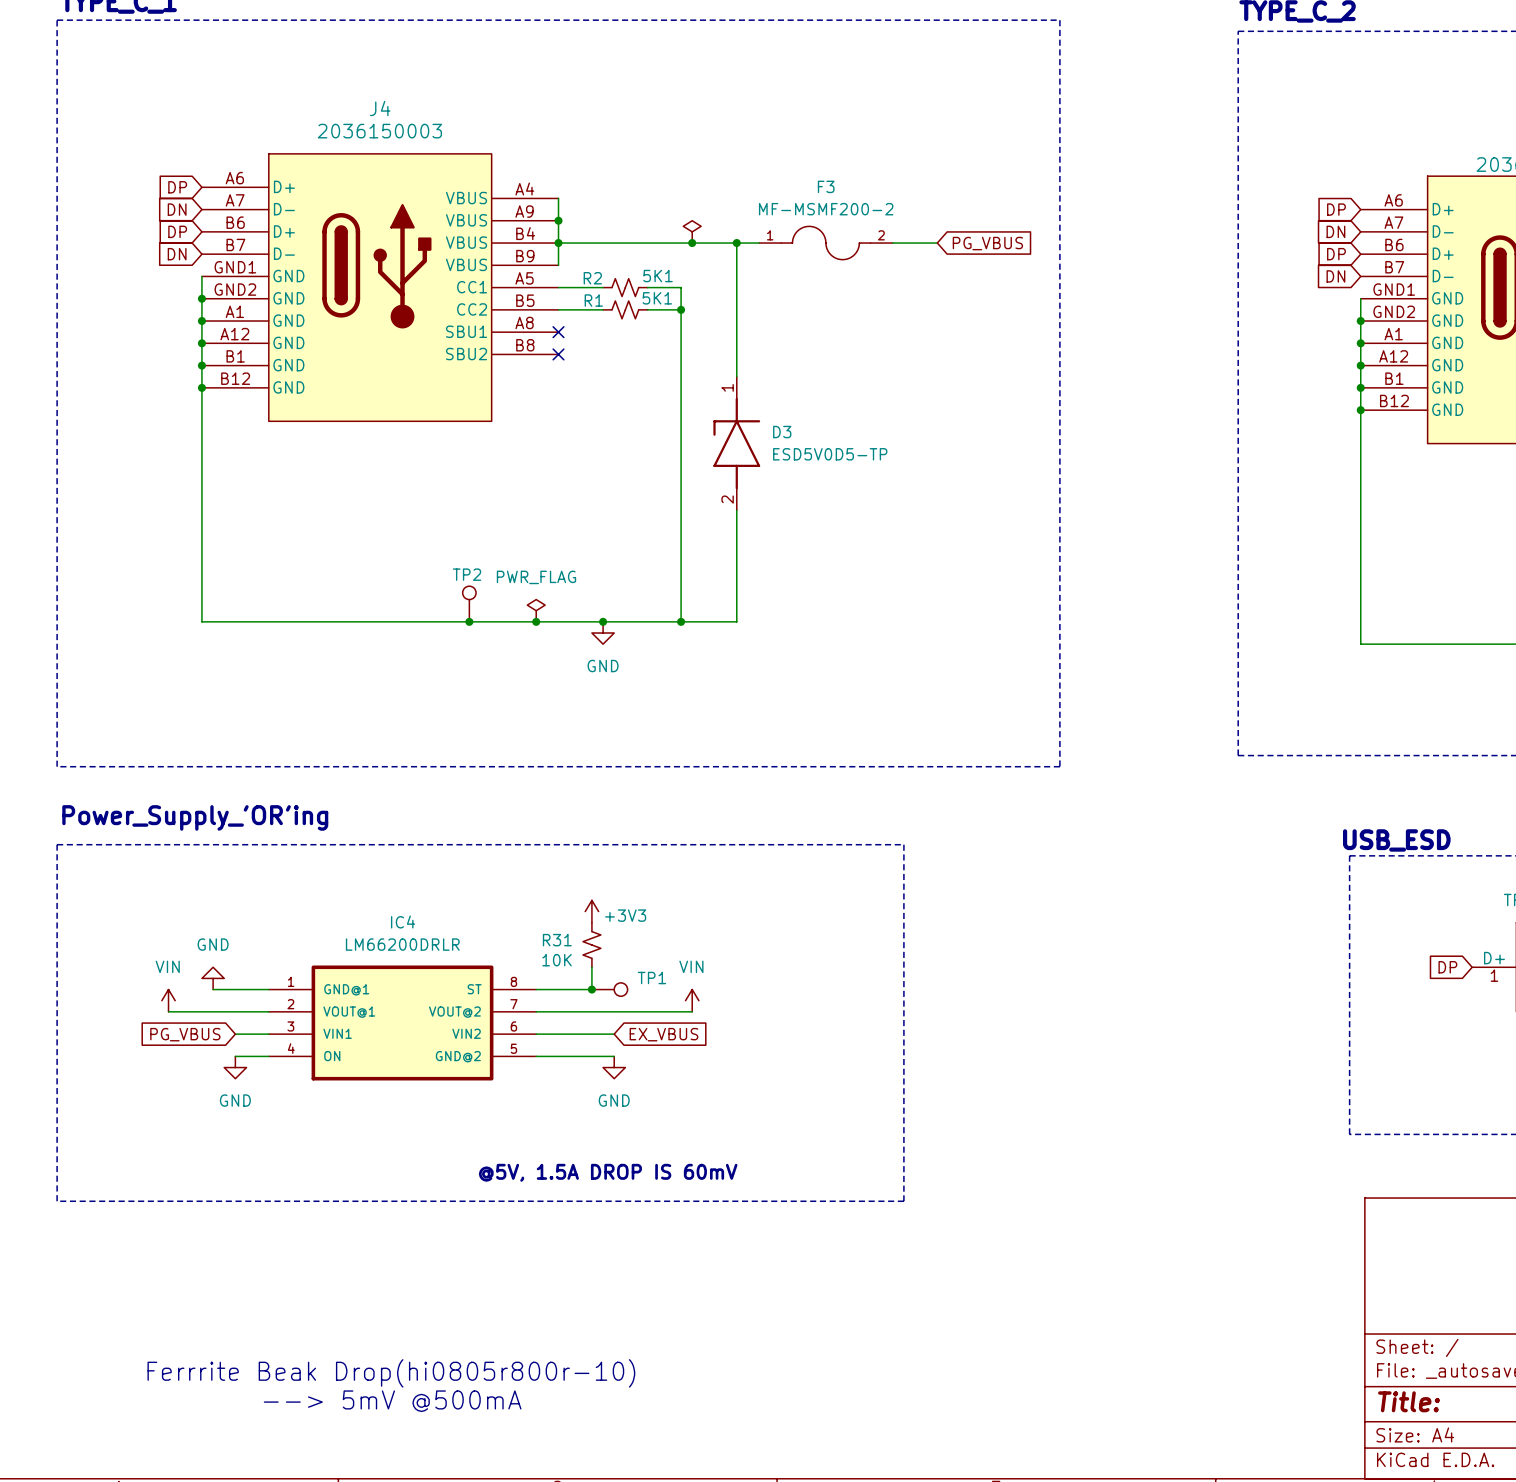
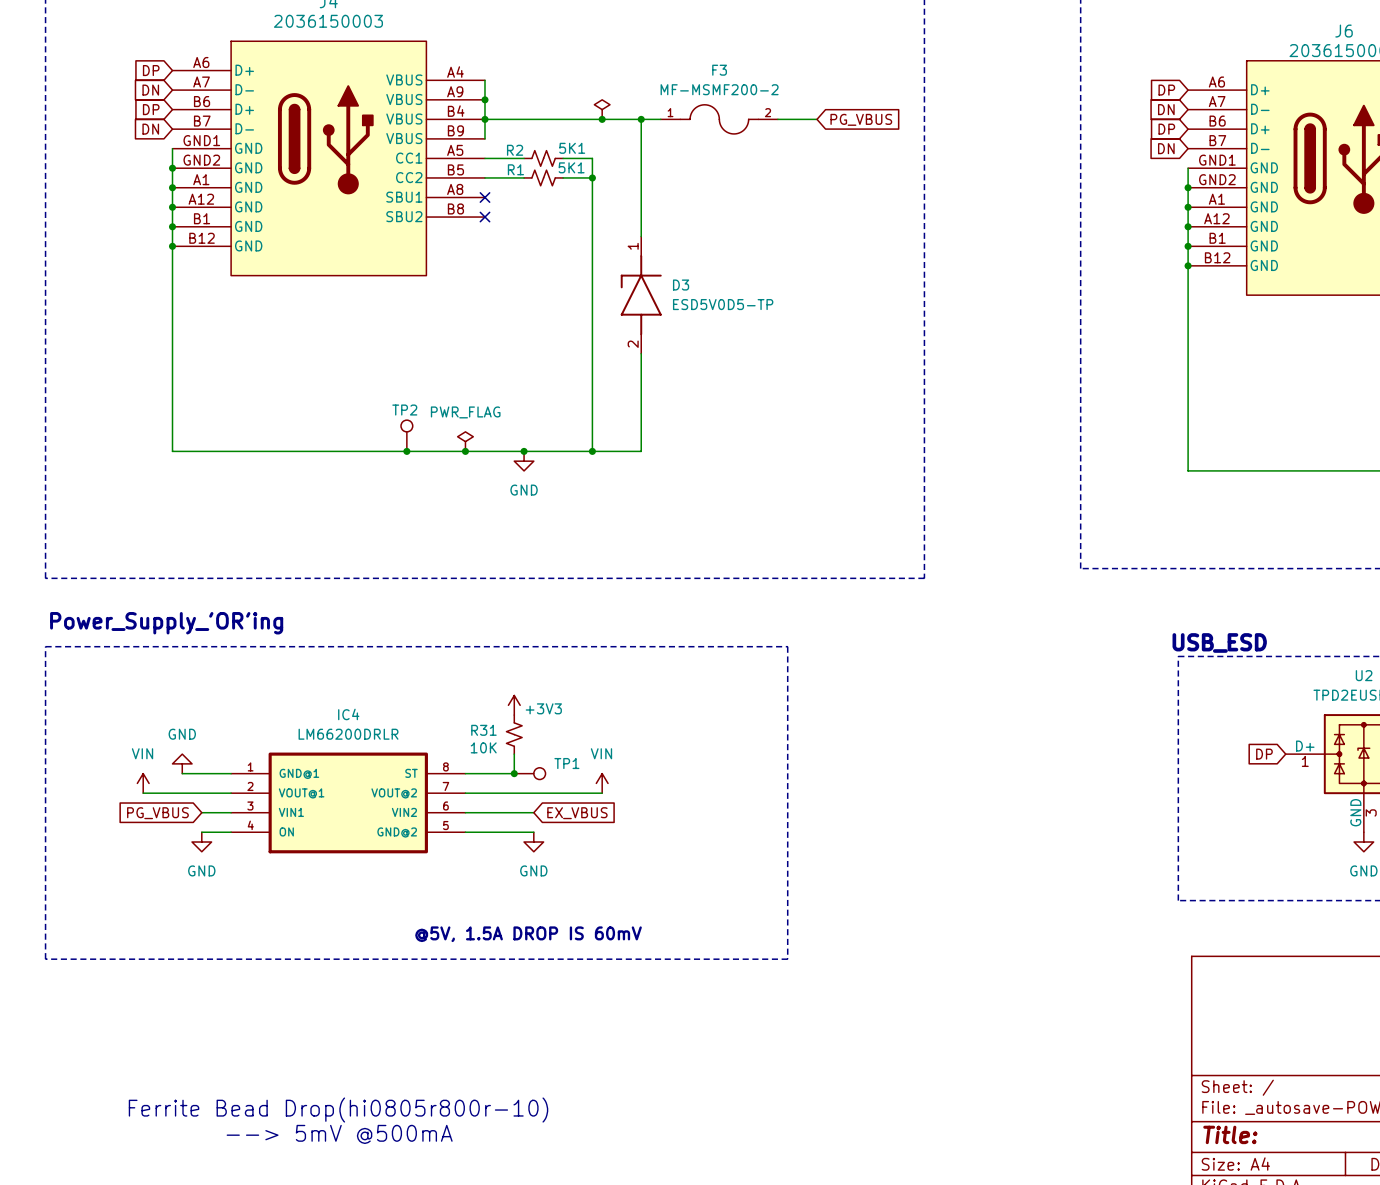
text: Ferrrite Beak Drop(hi0805r800r-10) (391, 1373) -> Ferrite Bead Drop(hi0805r800r-10) (338, 1110)

